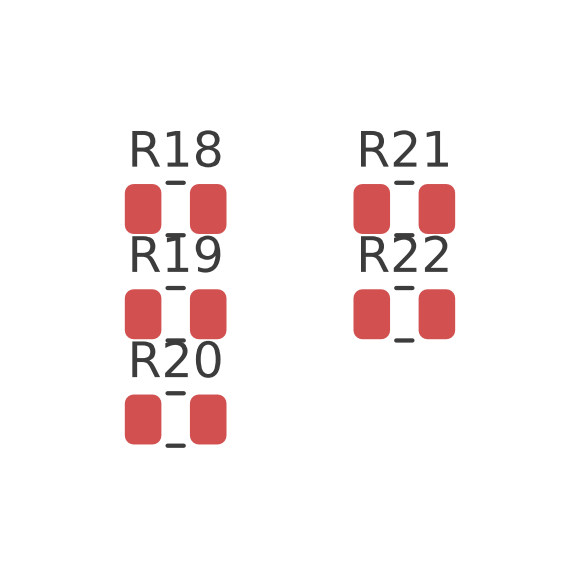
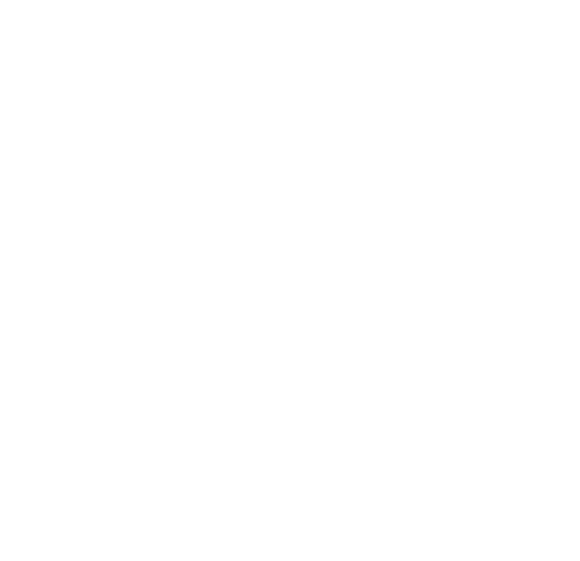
R18: (175, 209) -> none
R21: (404, 209) -> none
R19: (175, 314) -> none
R22: (404, 314) -> none
R20: (175, 419) -> none

